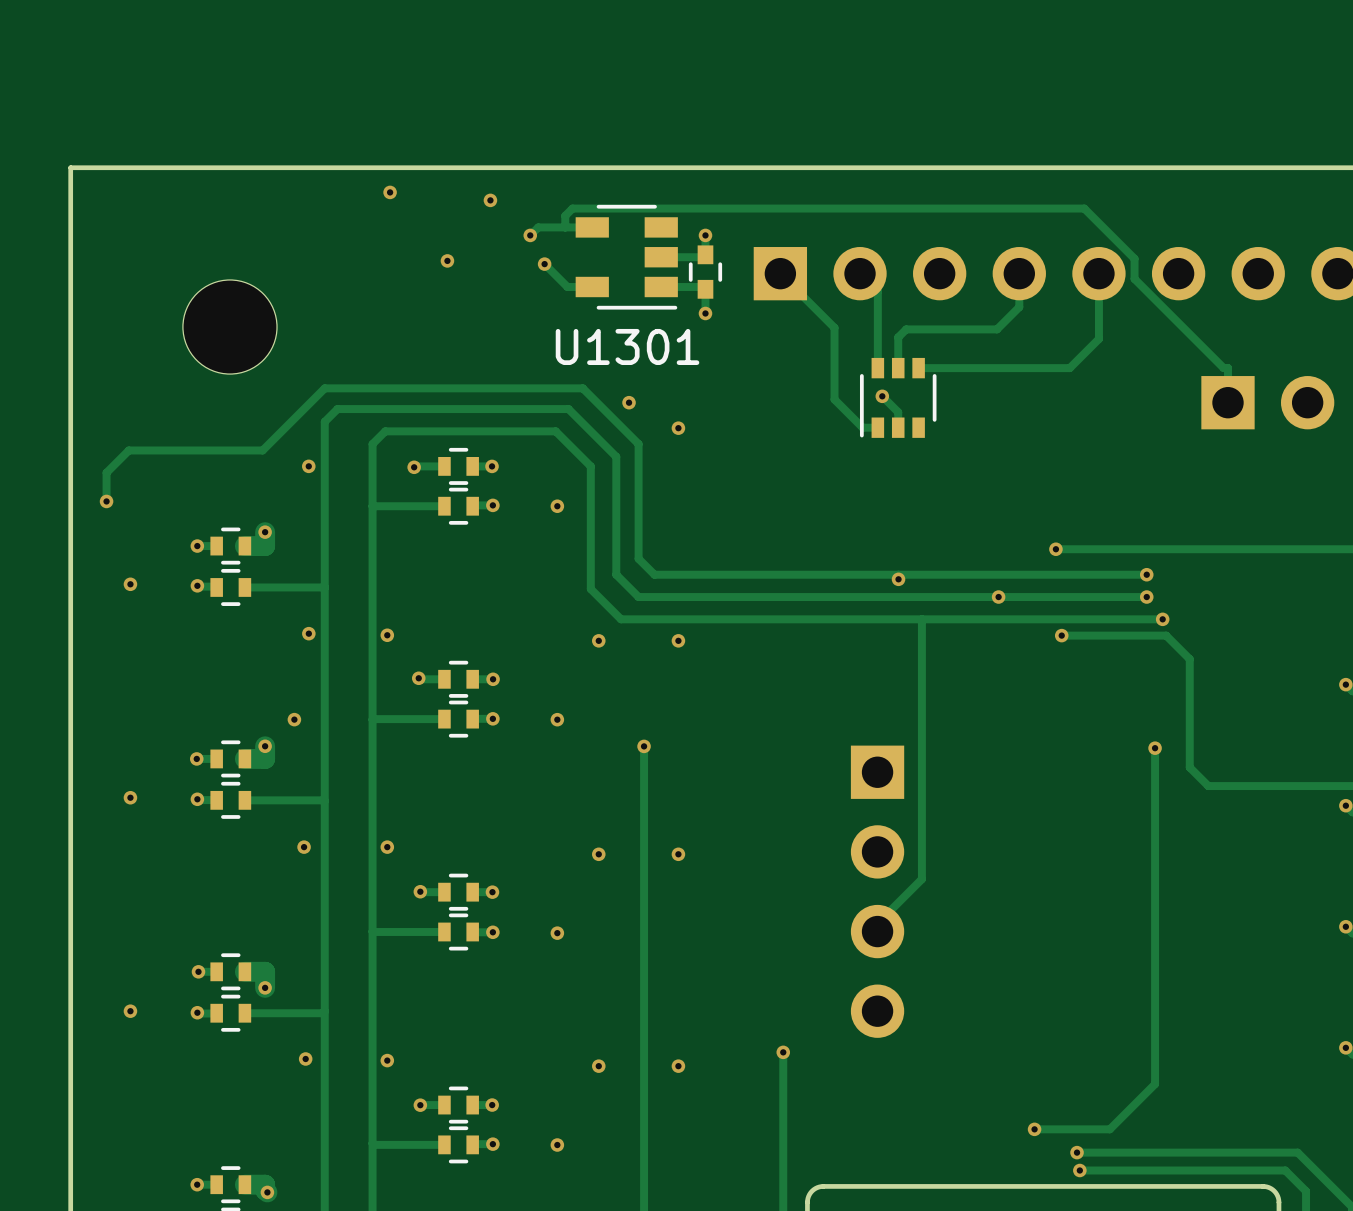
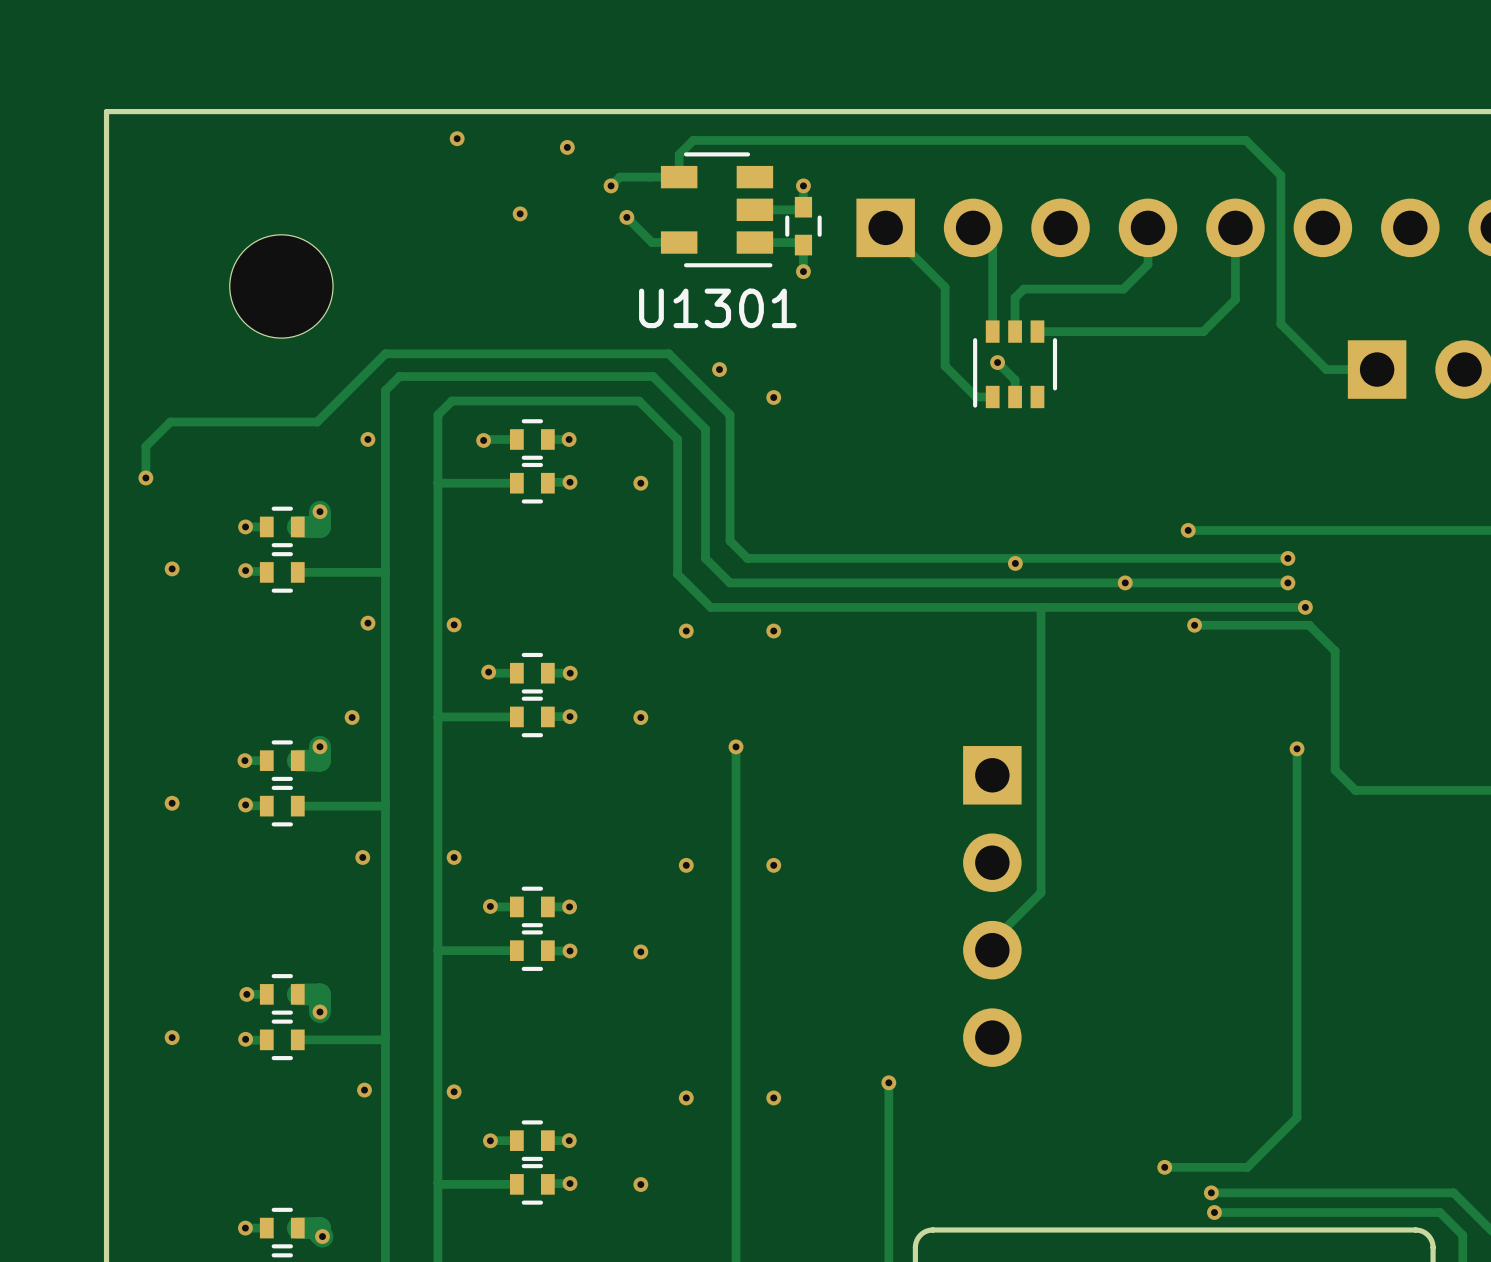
track: (565, 227) (565, 215) (572, 208) (1084, 208) (1134, 258) (1134, 278) (1223, 368) (1227, 368) (1227, 402) -> (679, 177) (679, 154) (693, 140) (1245, 140) (1280, 175) (1280, 324) (1326, 369) (1377, 369)

